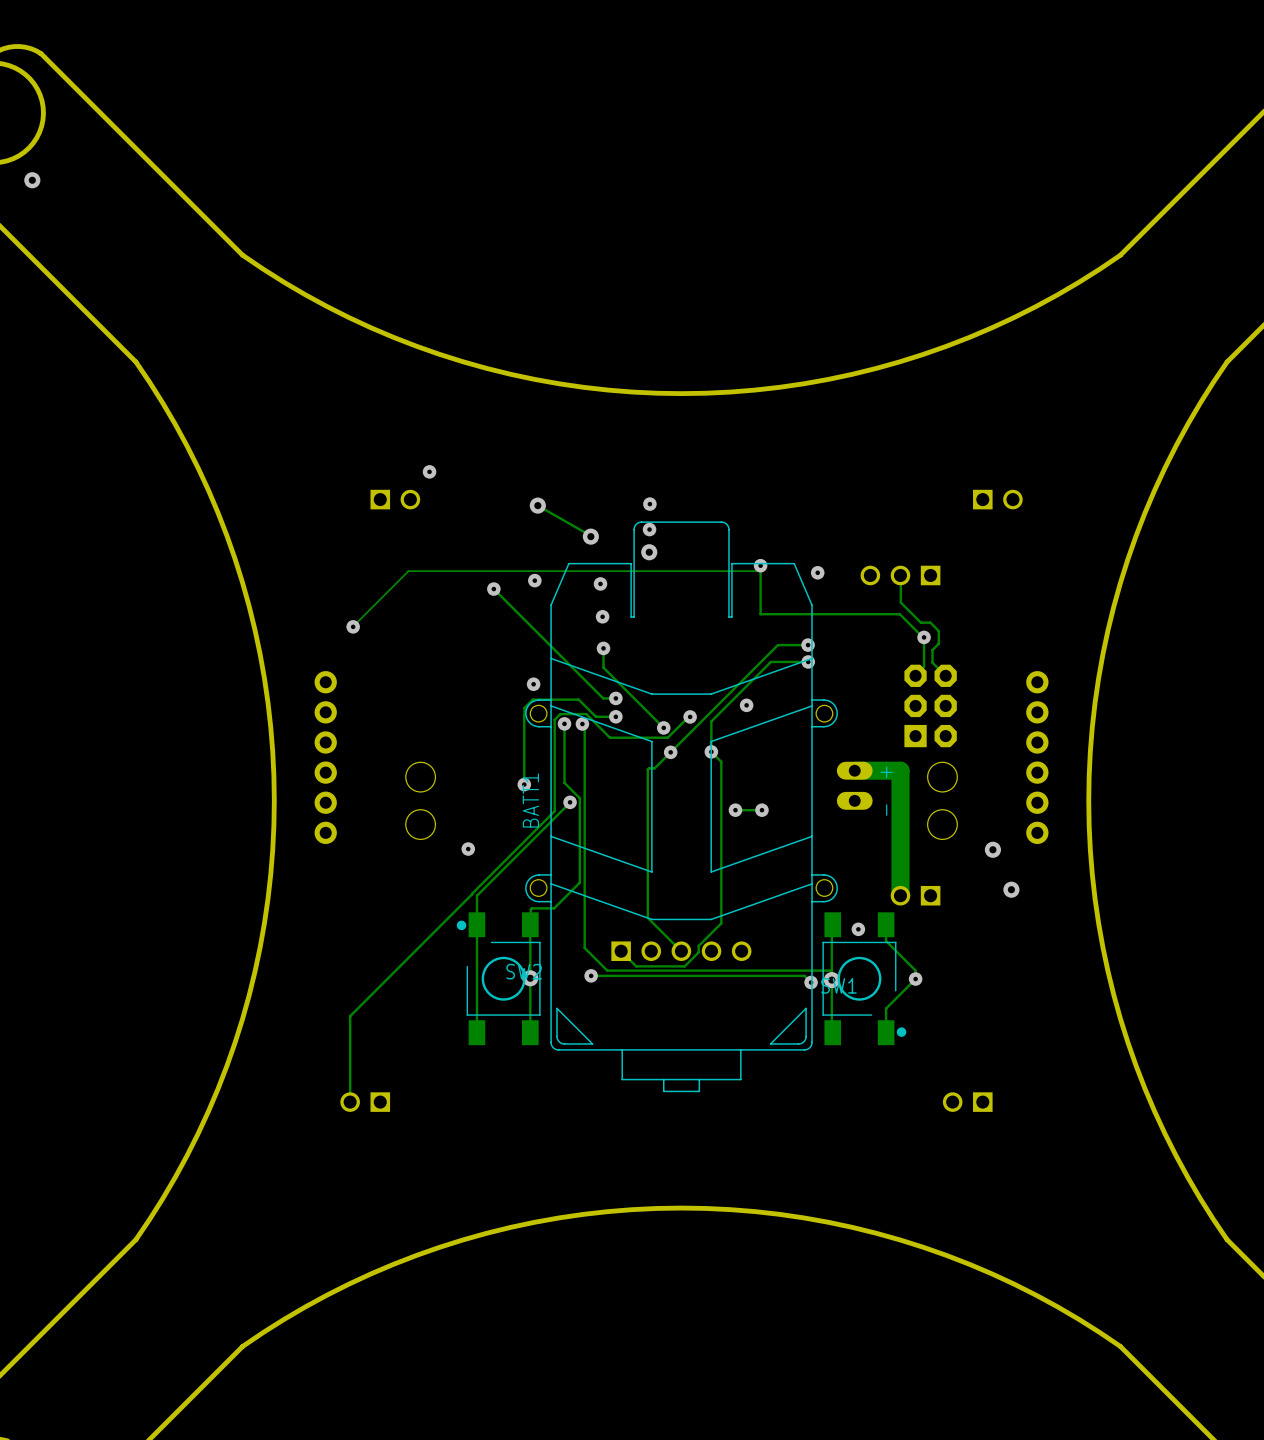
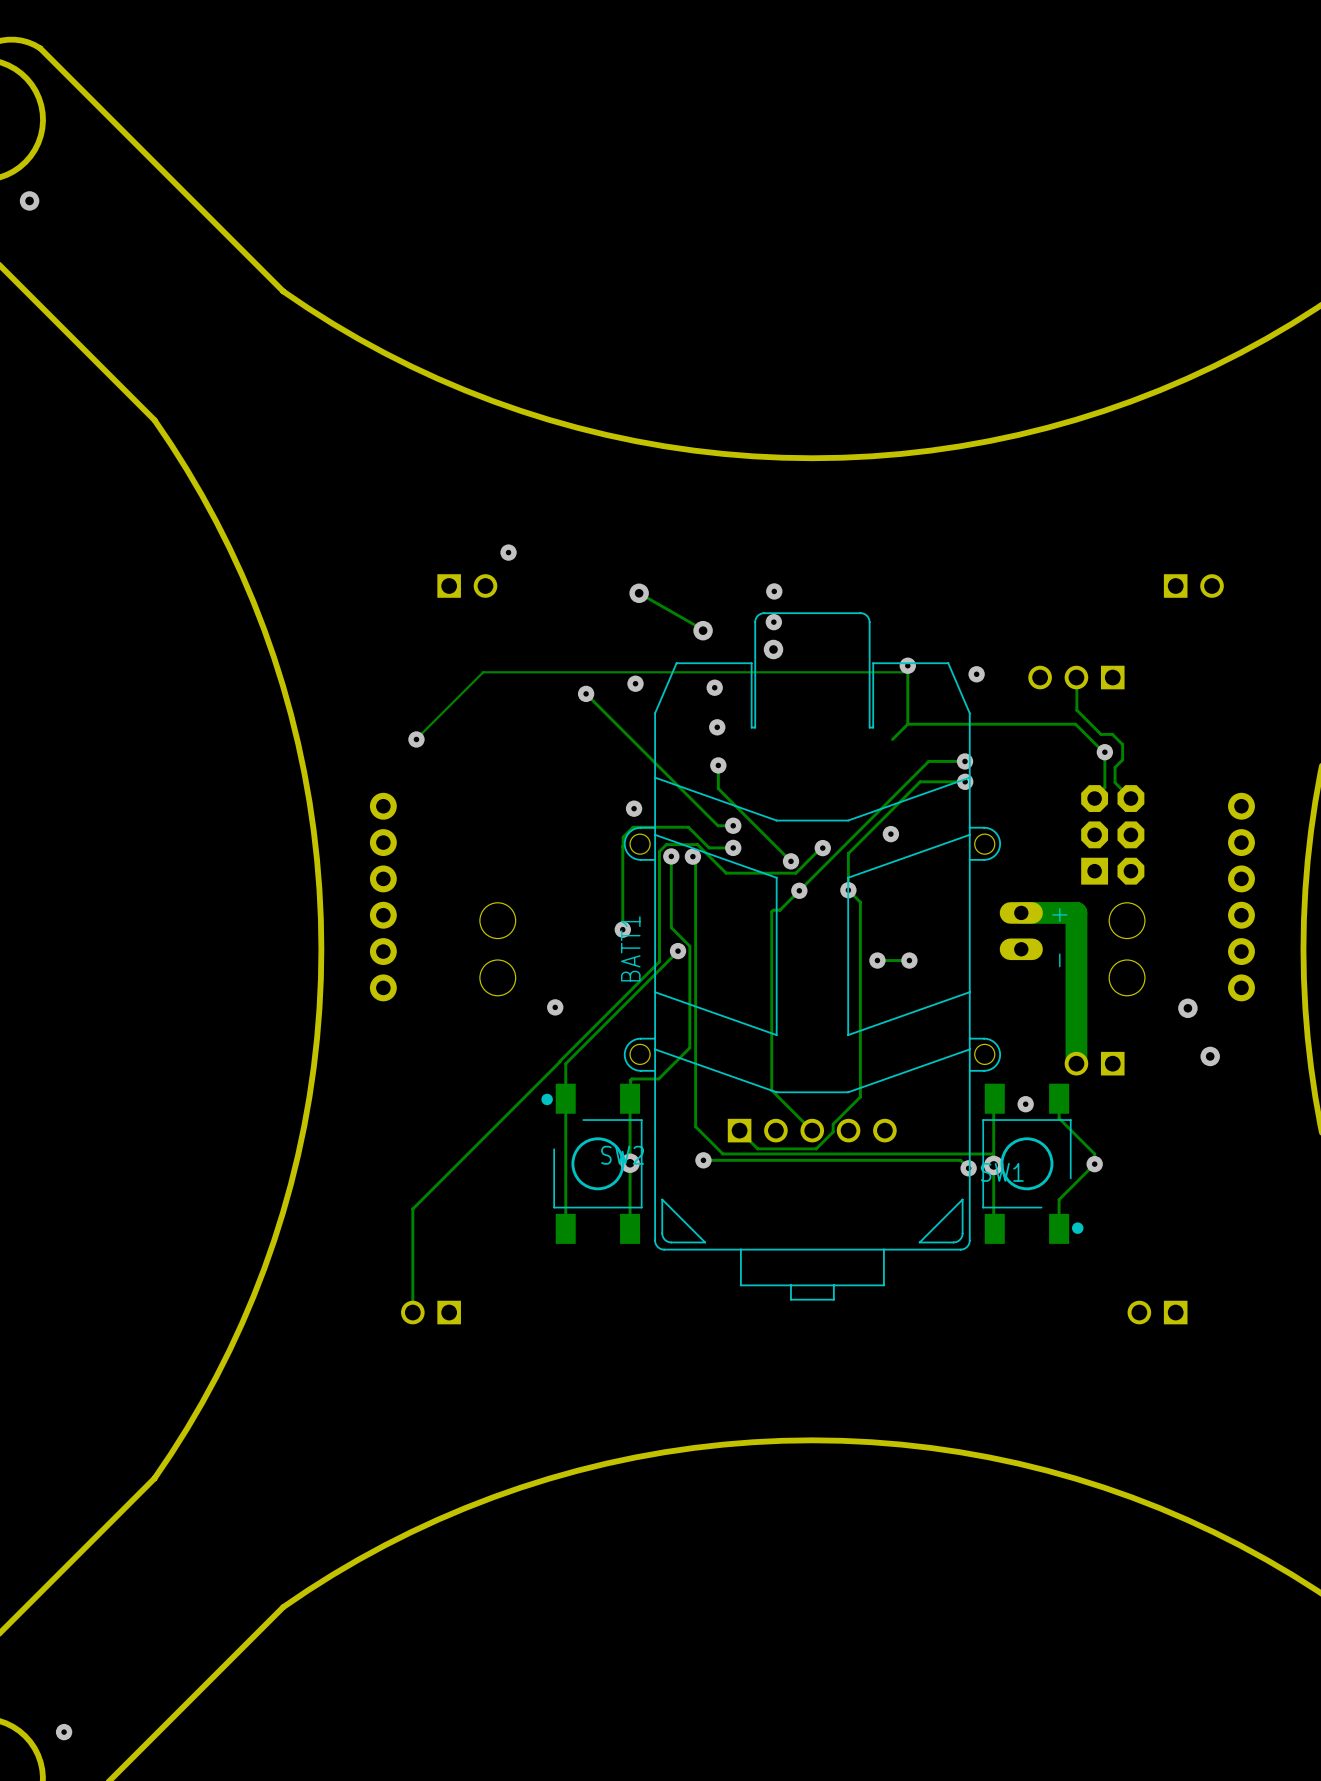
track: none -> (907, 724) (892, 739)

